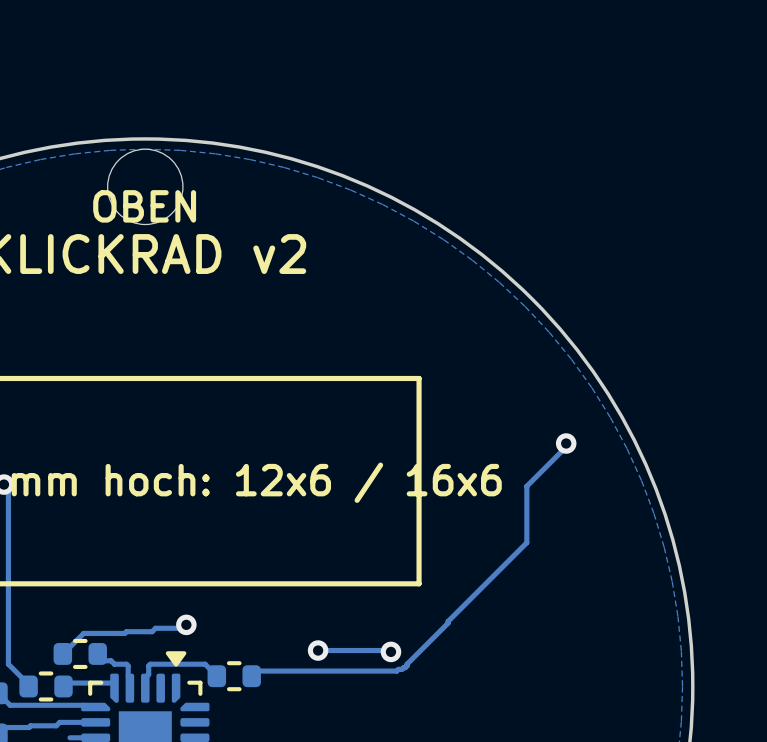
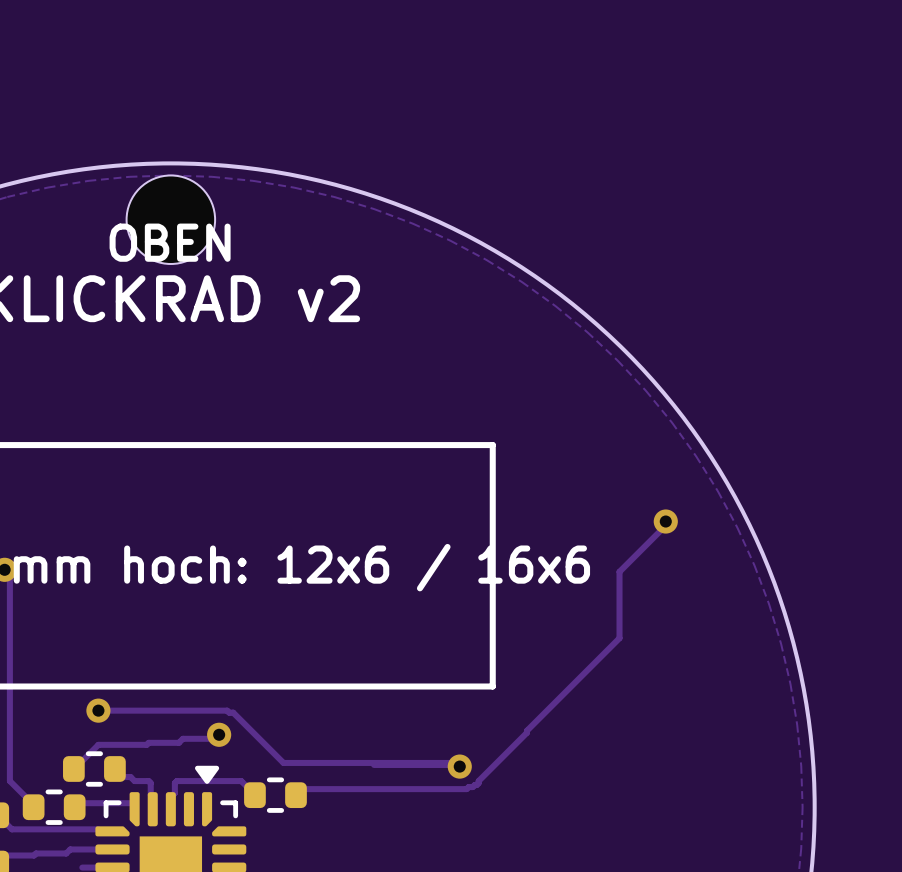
track: none -> (98, 710) (227, 710) (233, 712) (283, 762) (450, 762)
via: none -> (98, 710)
via: (318, 650) -> none

